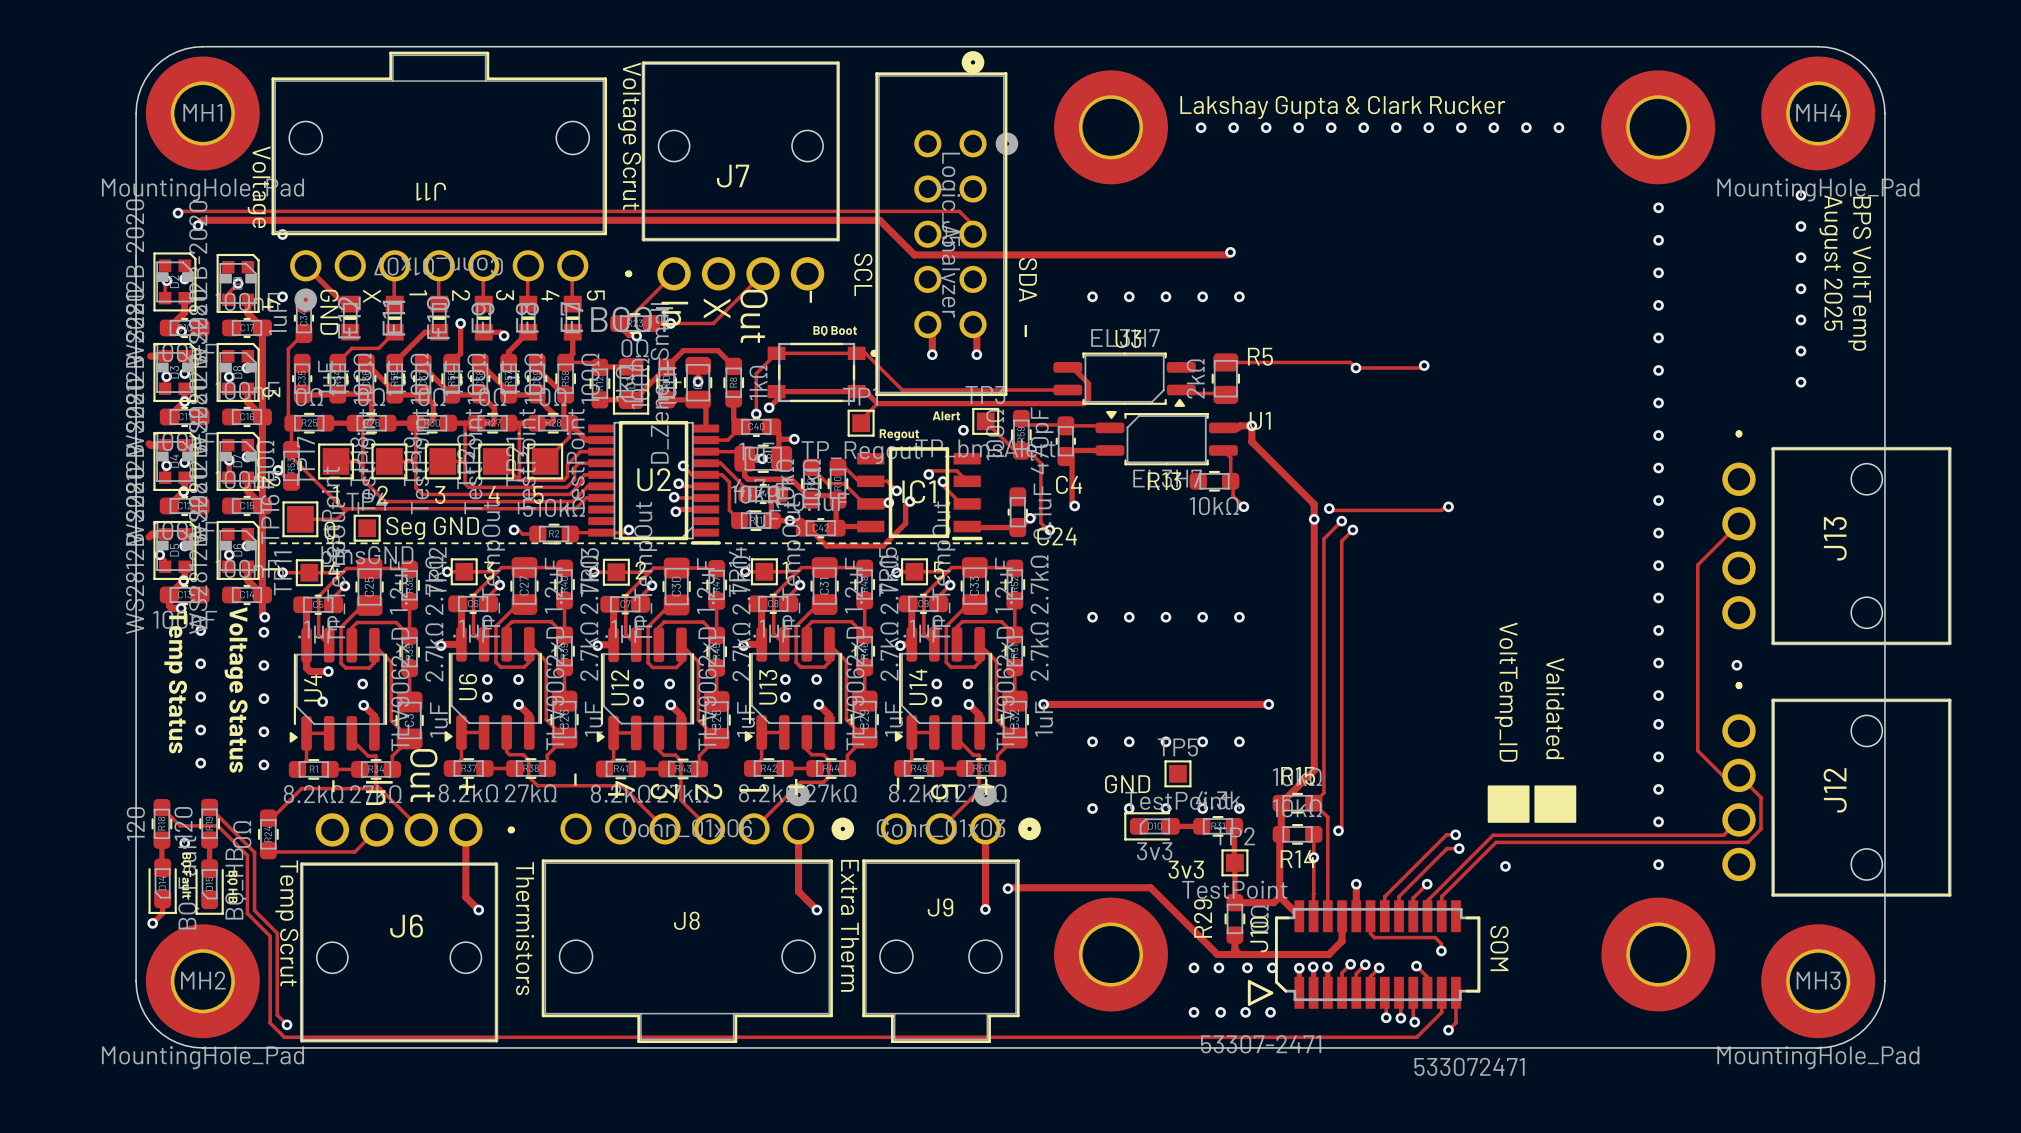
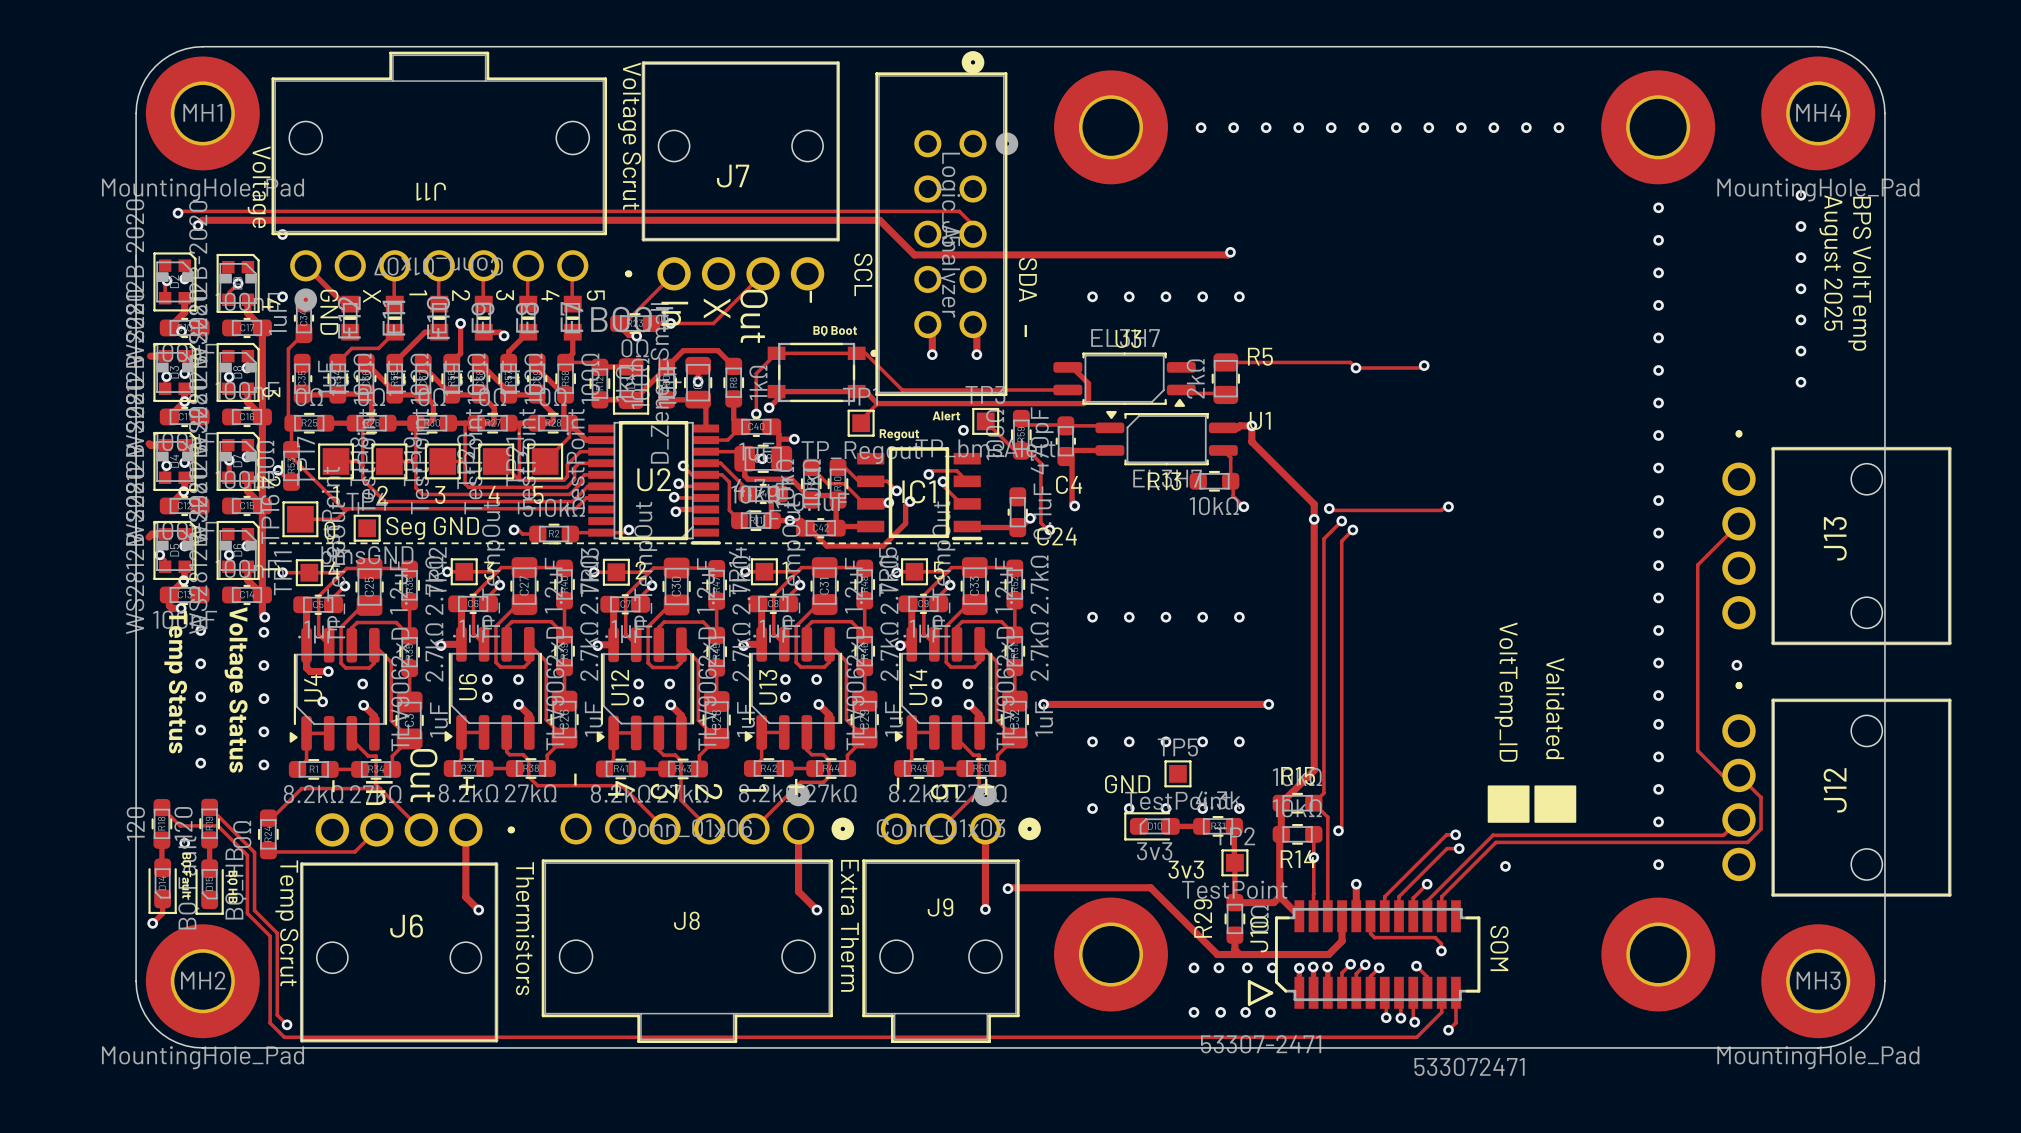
text: Lakshay Gupta & Clark Rucker (1342, 107) -> none

